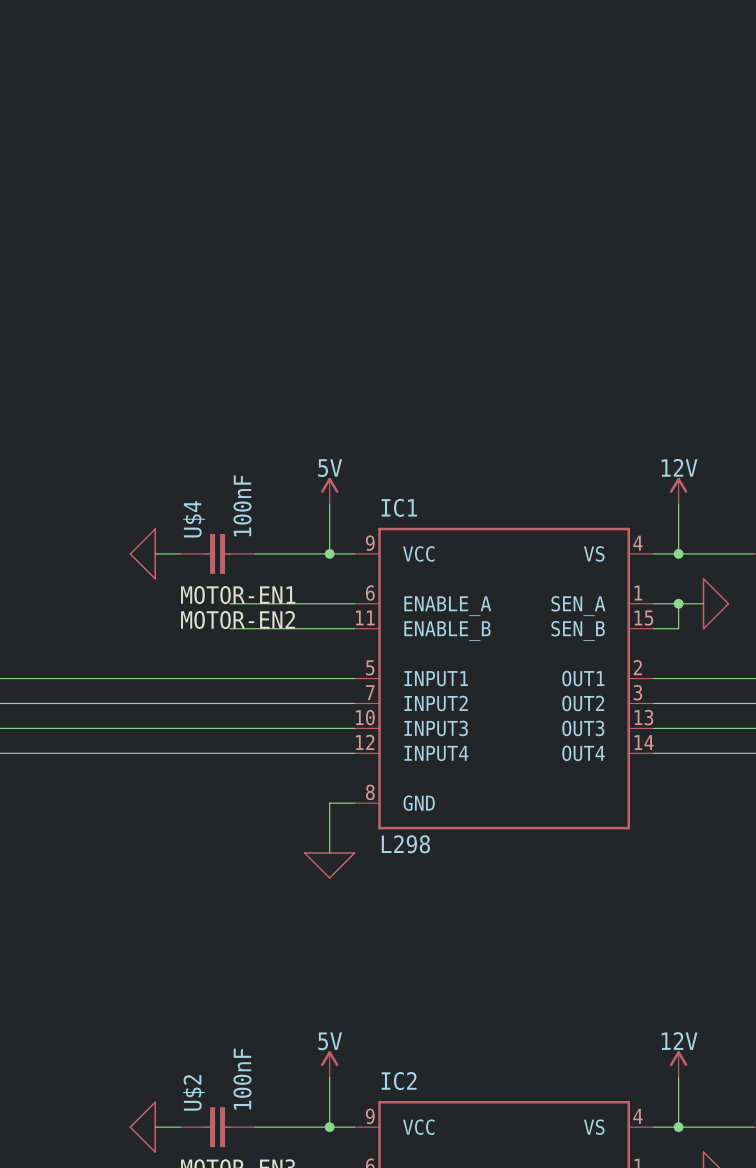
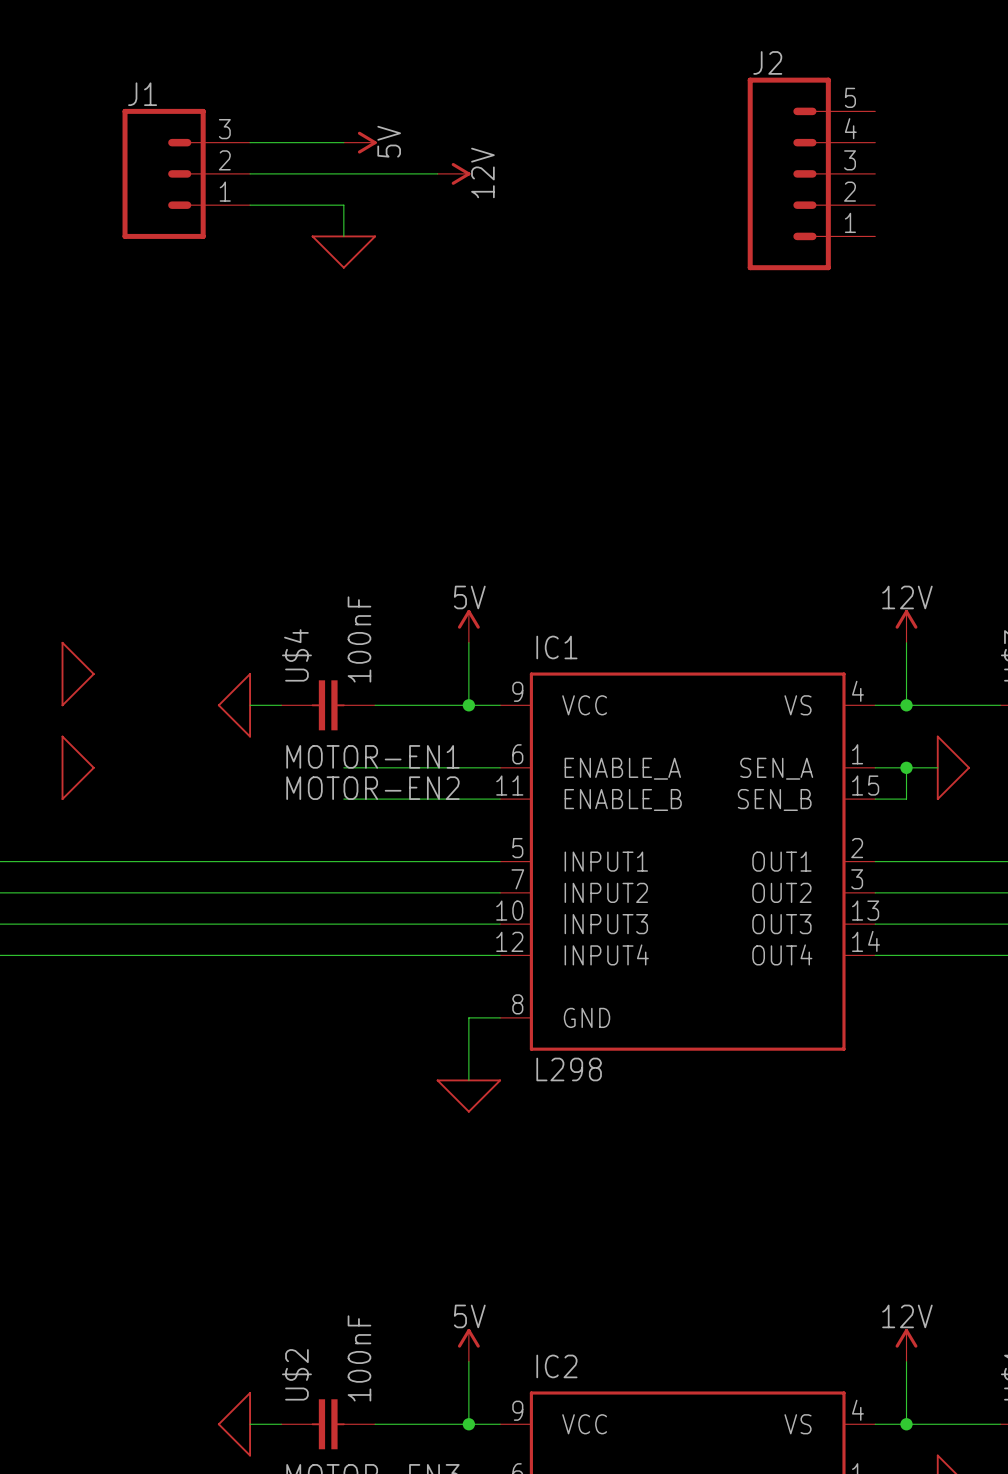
wire: none -> (250, 142) (343, 142)
power symbol: none -> 5V (360, 142)
J1: none -> (186, 173)
wire: none -> (250, 173) (437, 173)
power symbol: none -> 12V (454, 173)
J2: none -> (811, 173)
wire: none -> (250, 205) (343, 205) (343, 236)
power symbol: none -> (343, 252)
power symbol: none -> (78, 674)
power symbol: none -> (78, 767)

